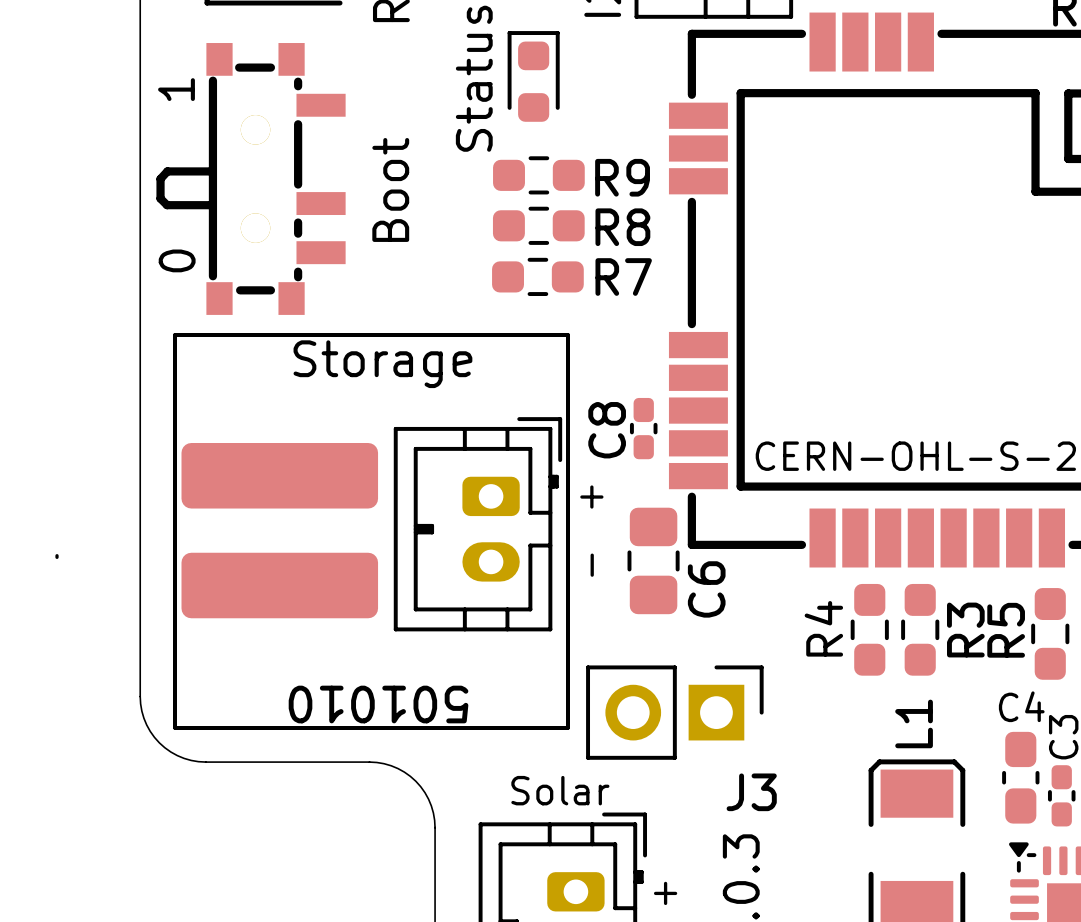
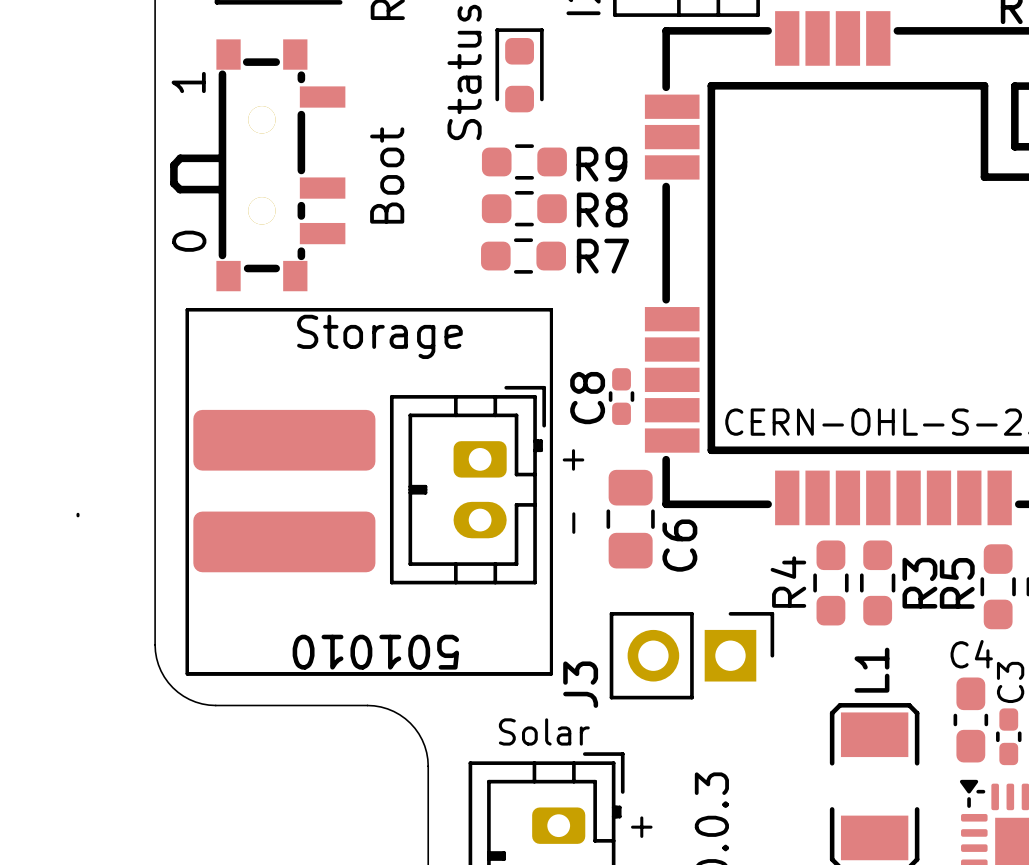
J3 position: (674, 712) -> (691, 655)
J3 name rotation: 0° (751, 792) -> 90° counterclockwise (580, 684)
J3 name position: J3 (751, 792) -> J3 (580, 684)

